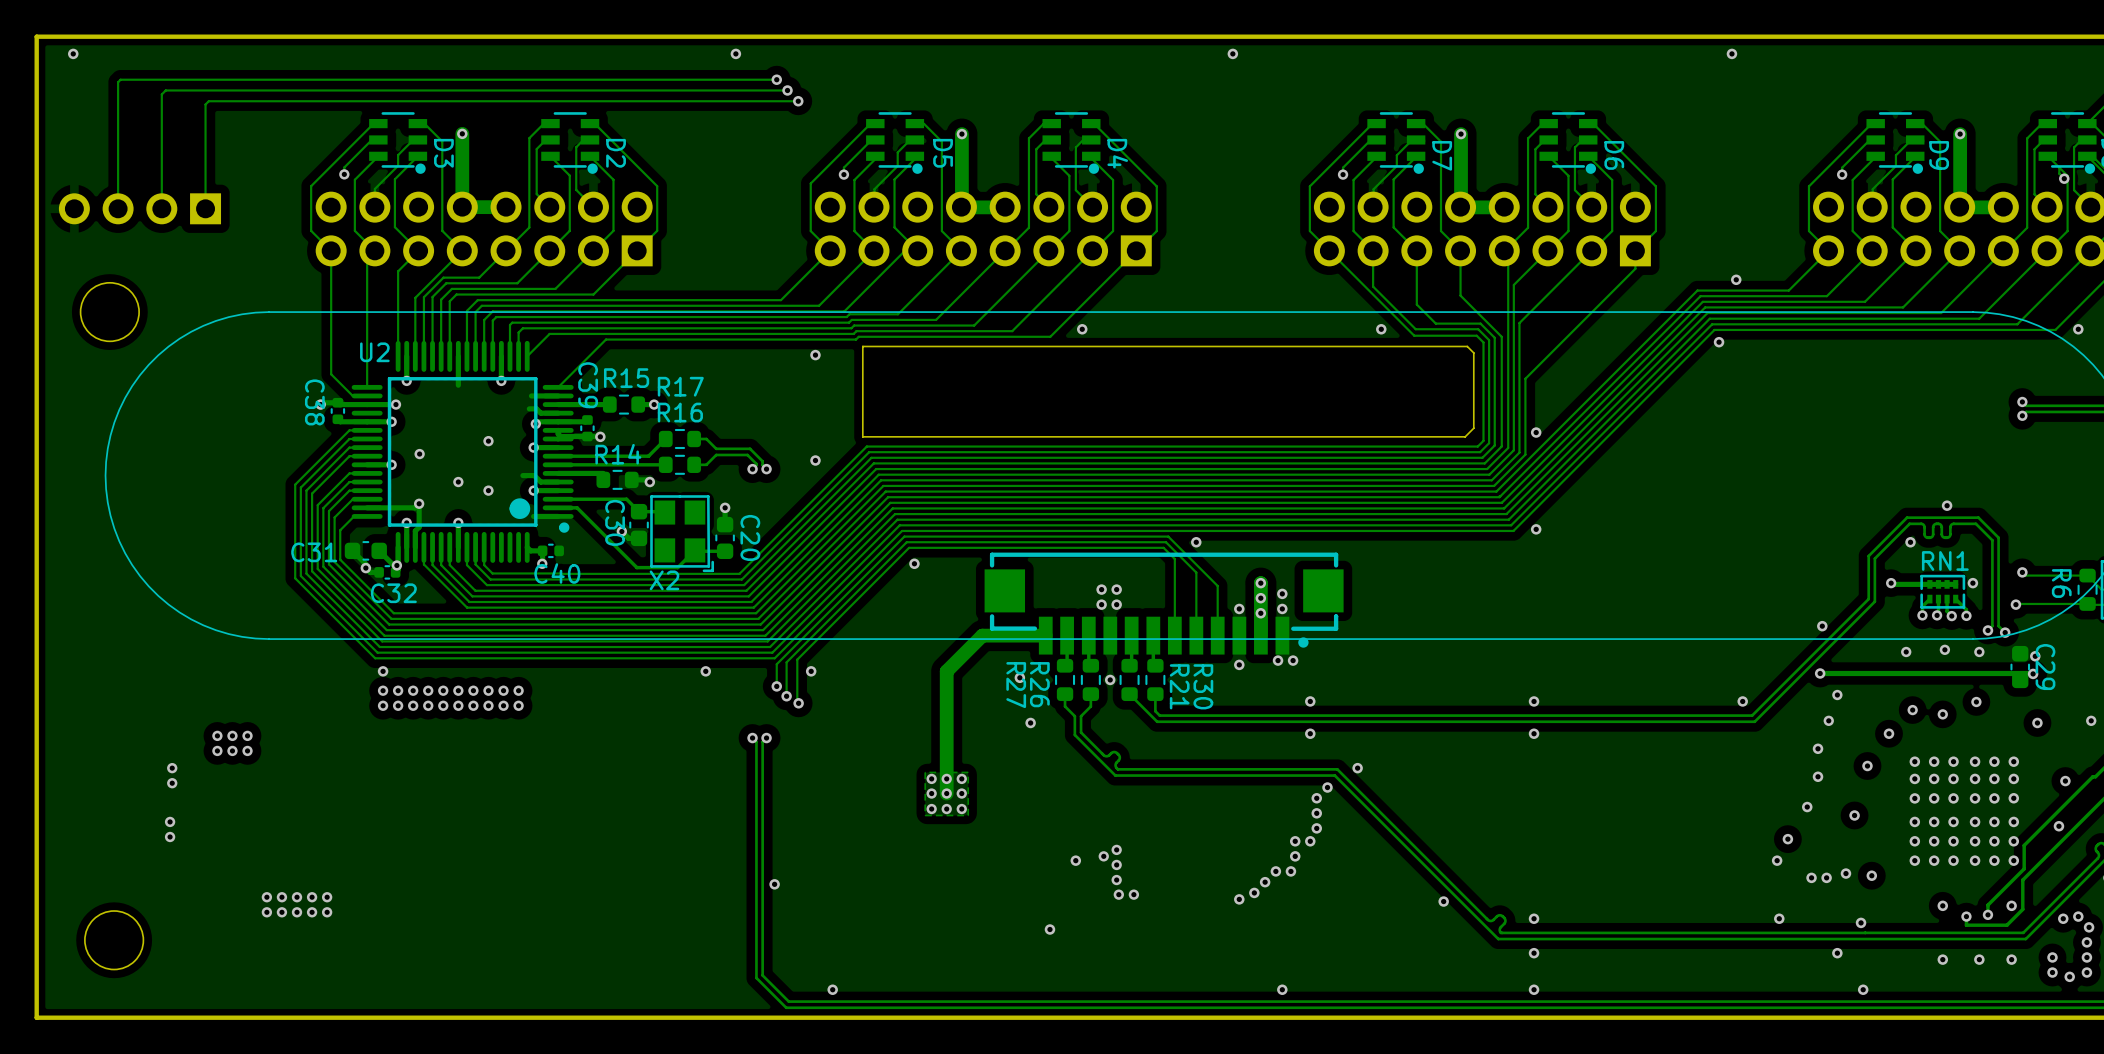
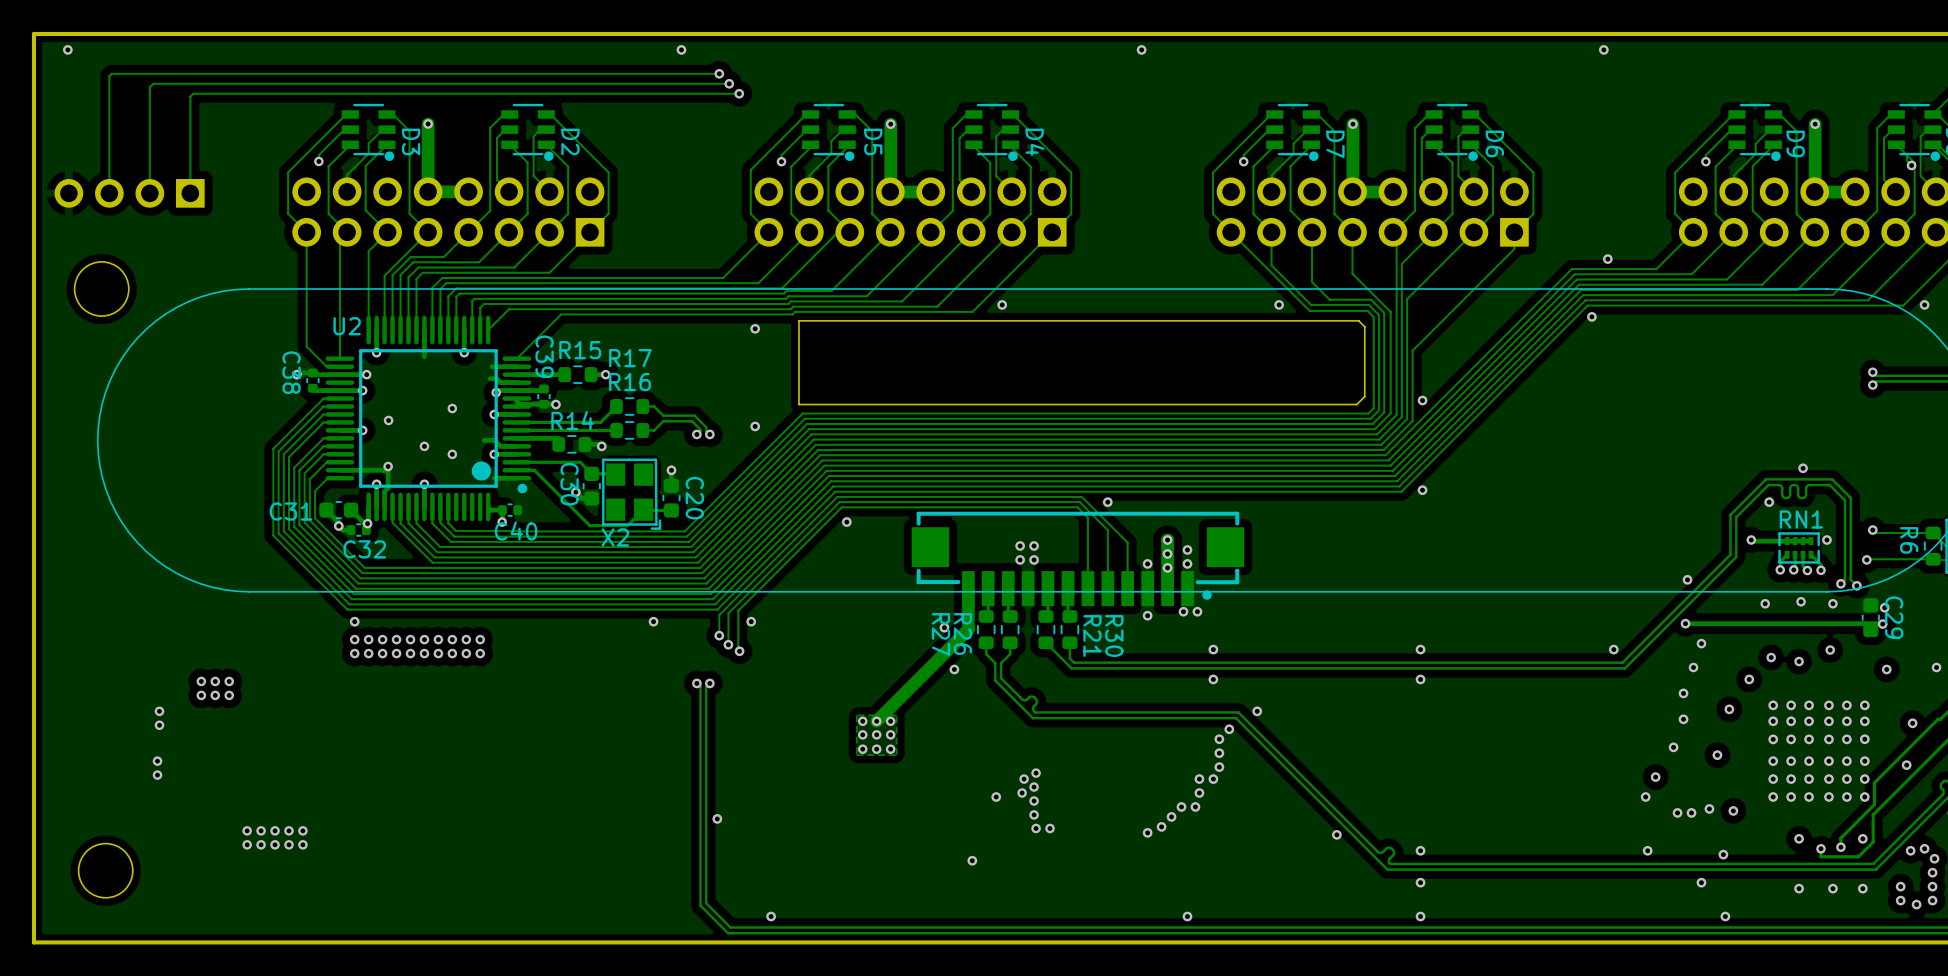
track: (1045, 635) (982, 635) (946, 671) (946, 793) -> (968, 588) (968, 629) (876, 721)
via: (1110, 679) -> none
via: none -> (1036, 773)
via: none -> (1024, 779)

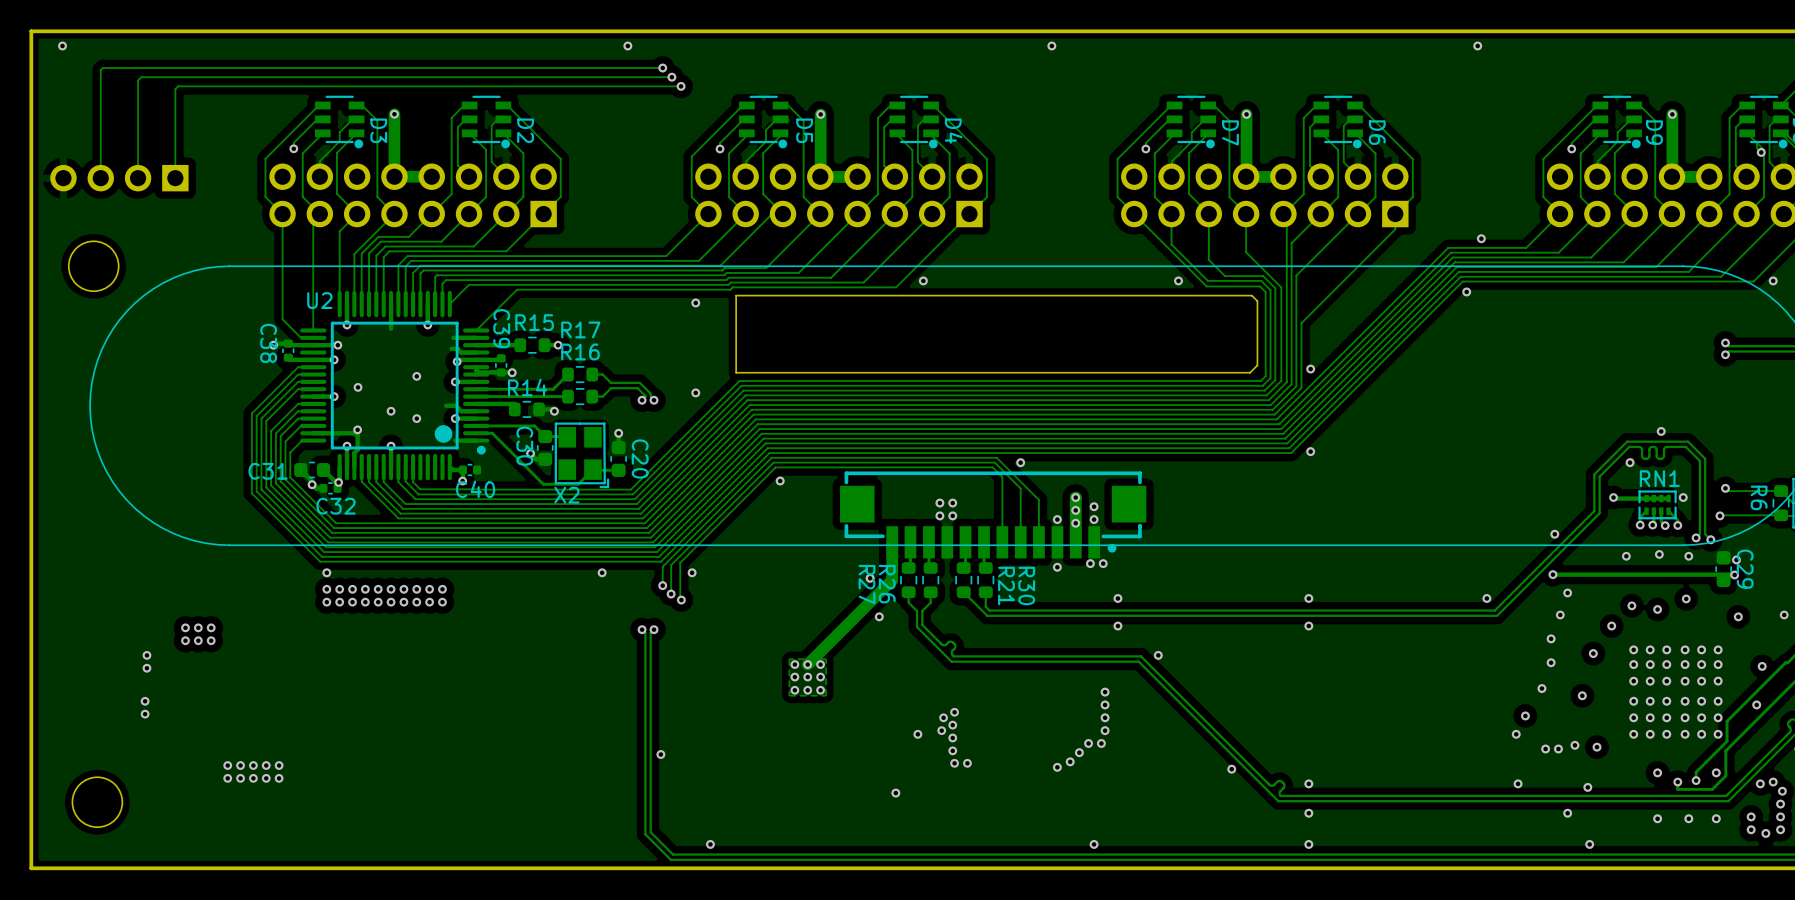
via: (1229, 729) -> none
via: (1219, 739) -> none
via: none -> (1105, 692)
via: (1219, 753) -> none
via: none -> (1105, 704)
via: (1219, 767) -> none
via: (1213, 779) -> none

